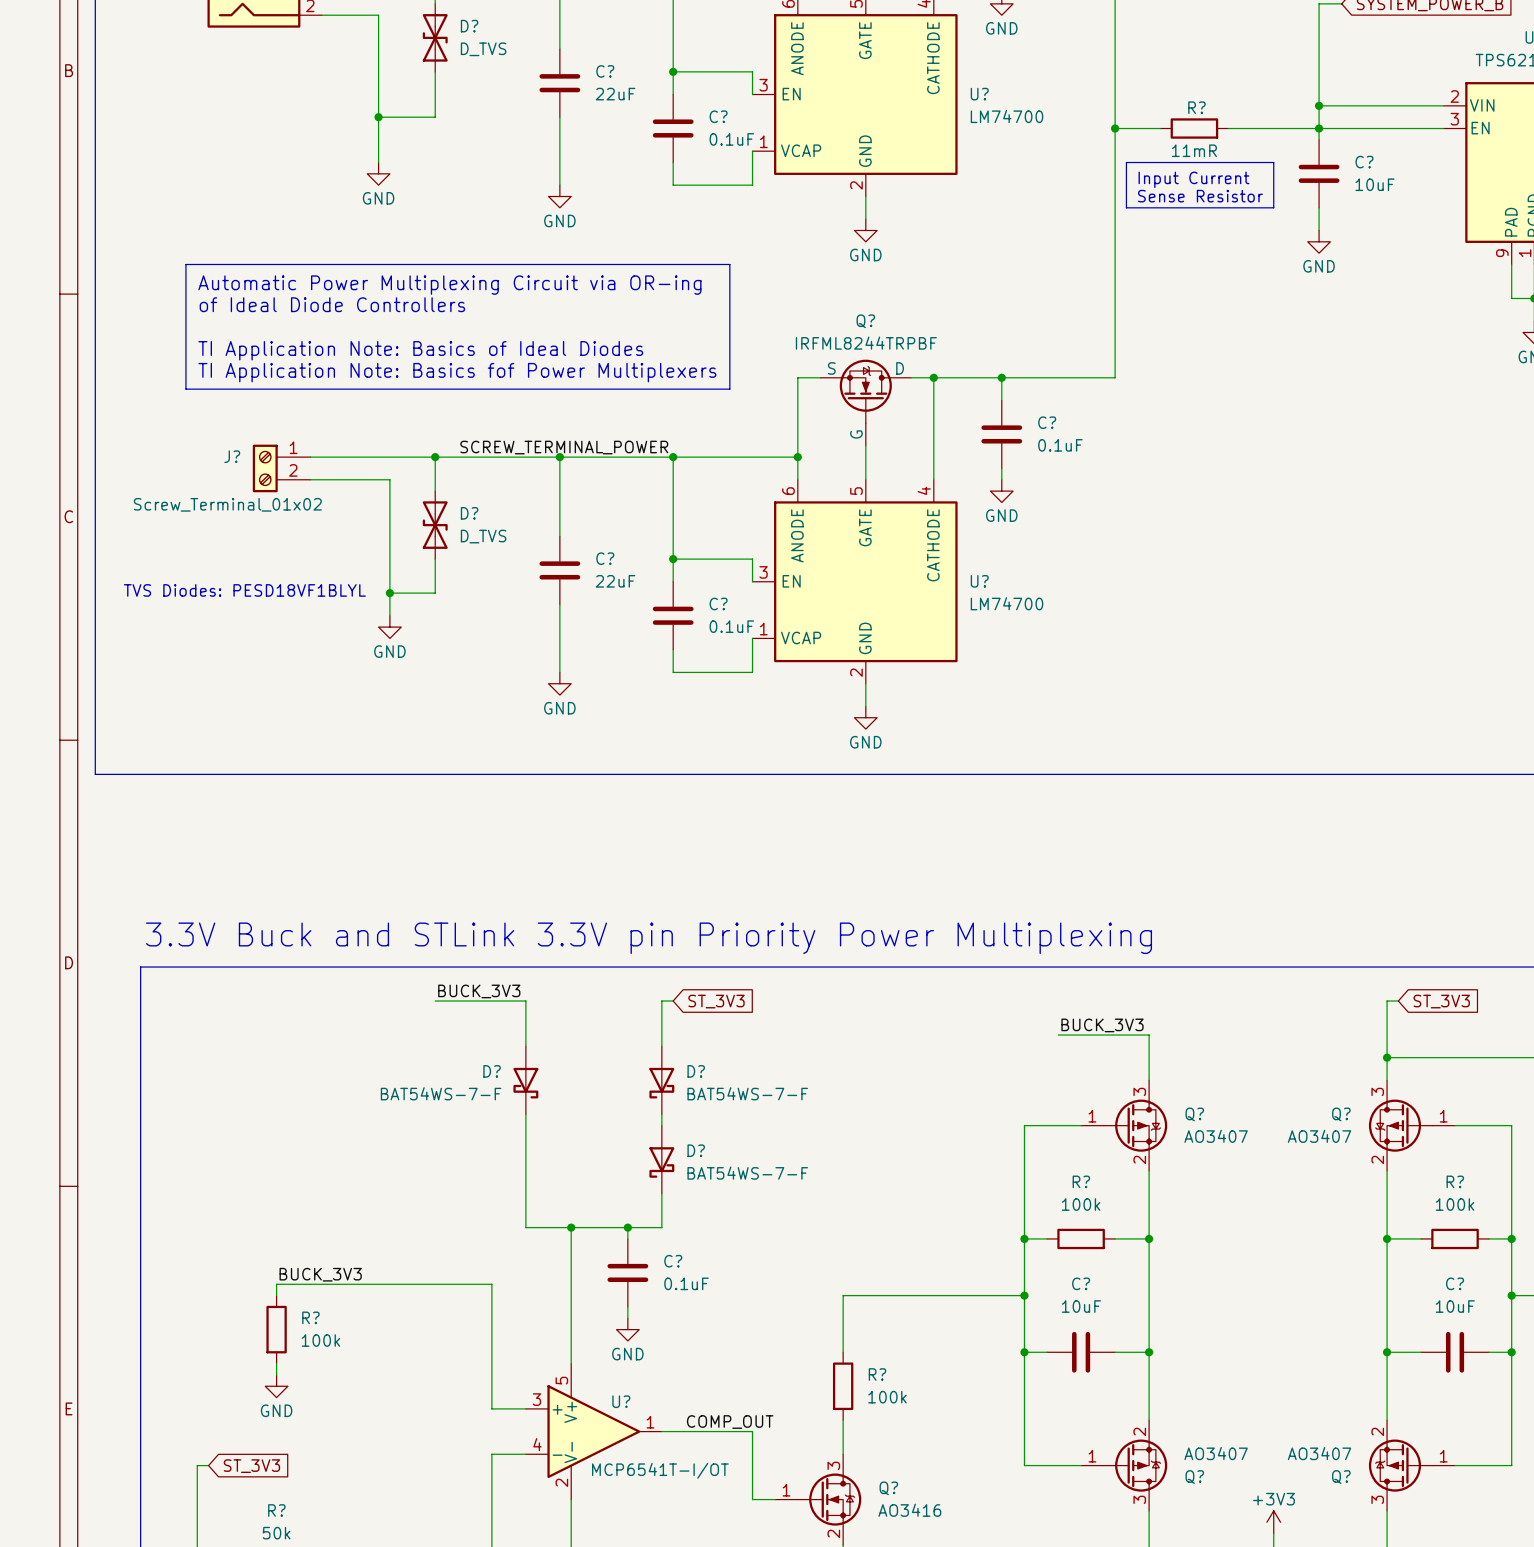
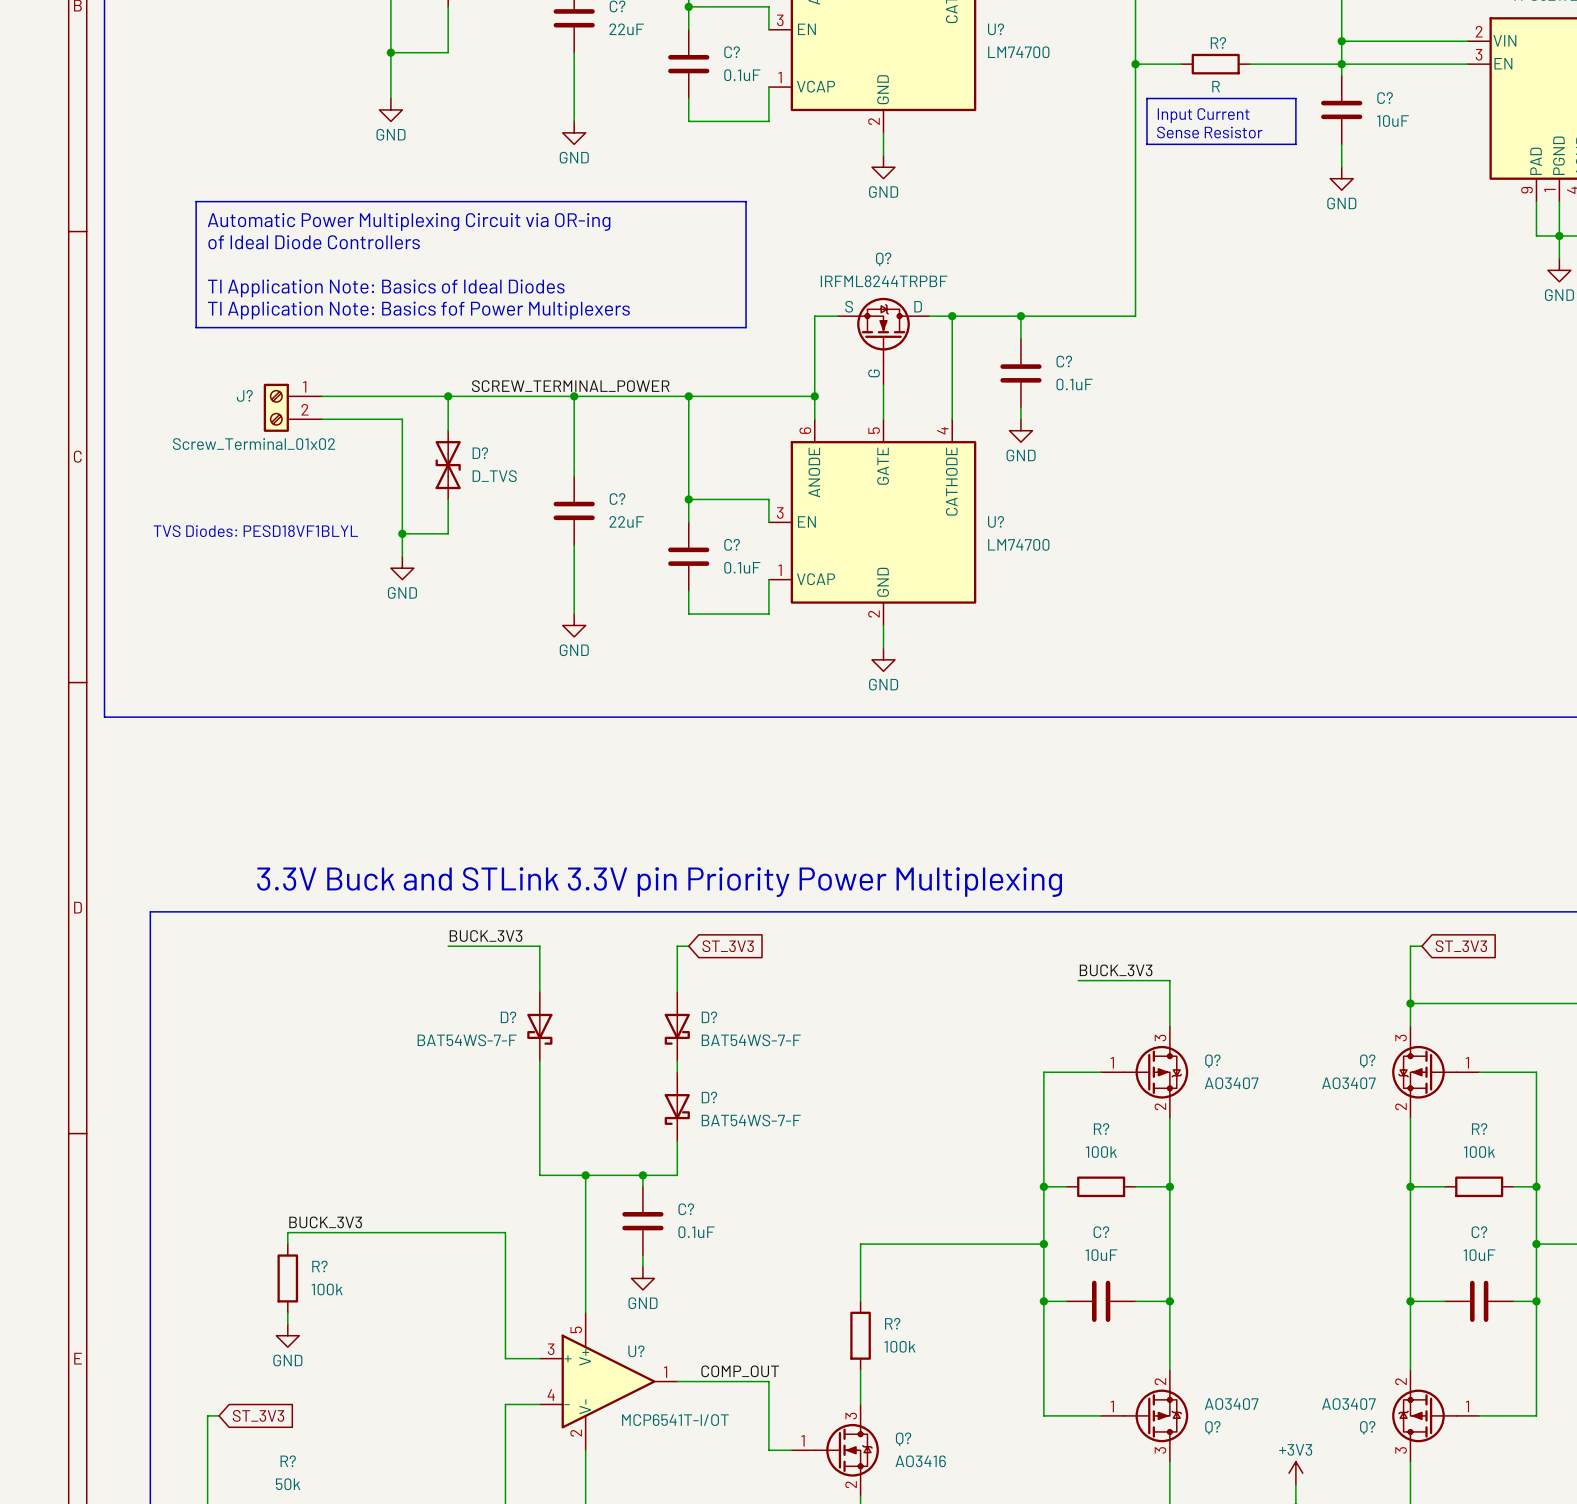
R? value: 11mR (1194, 150) -> R (1216, 86)

